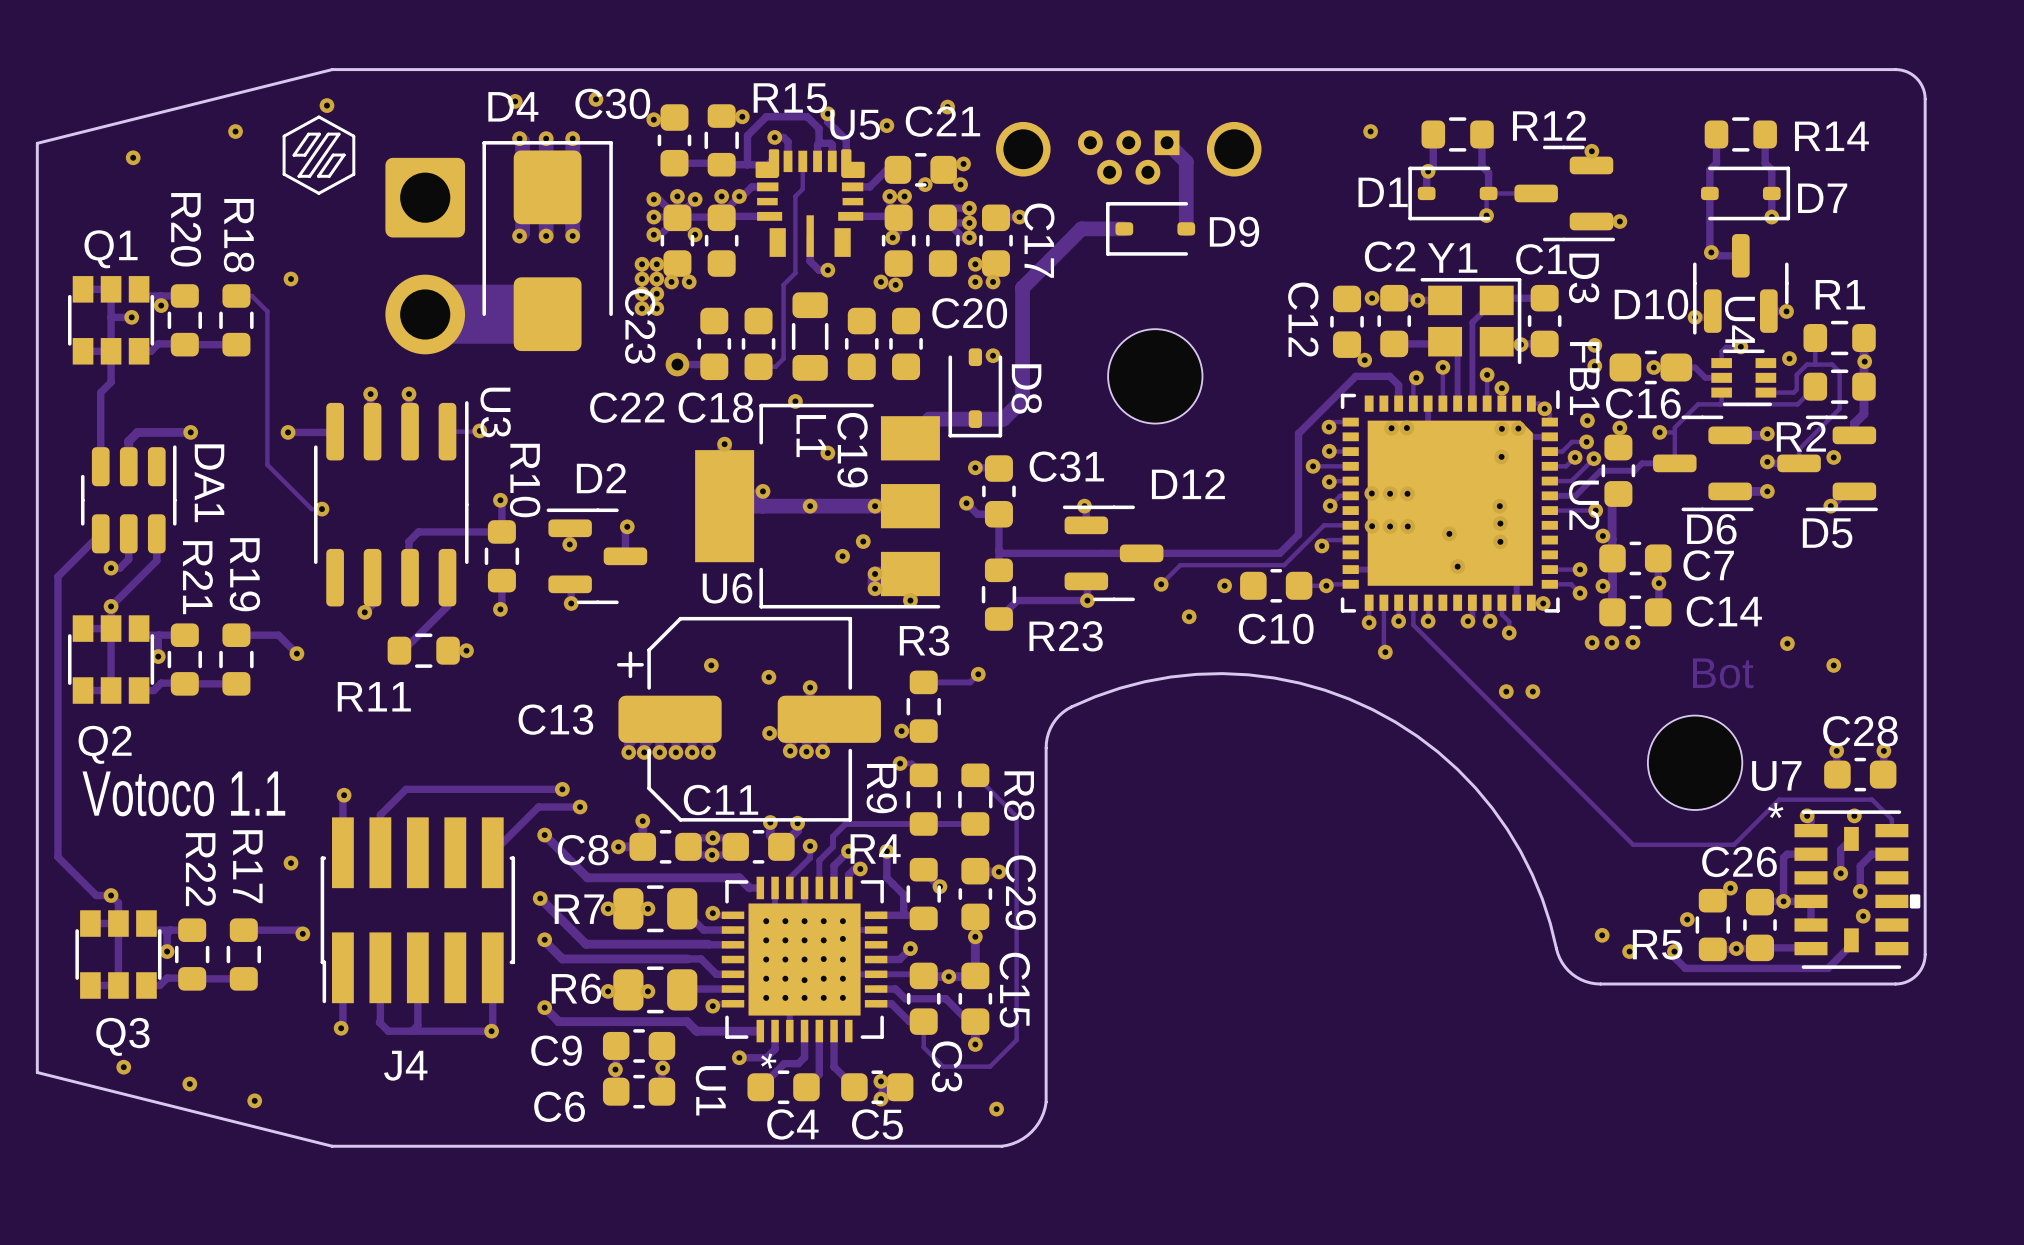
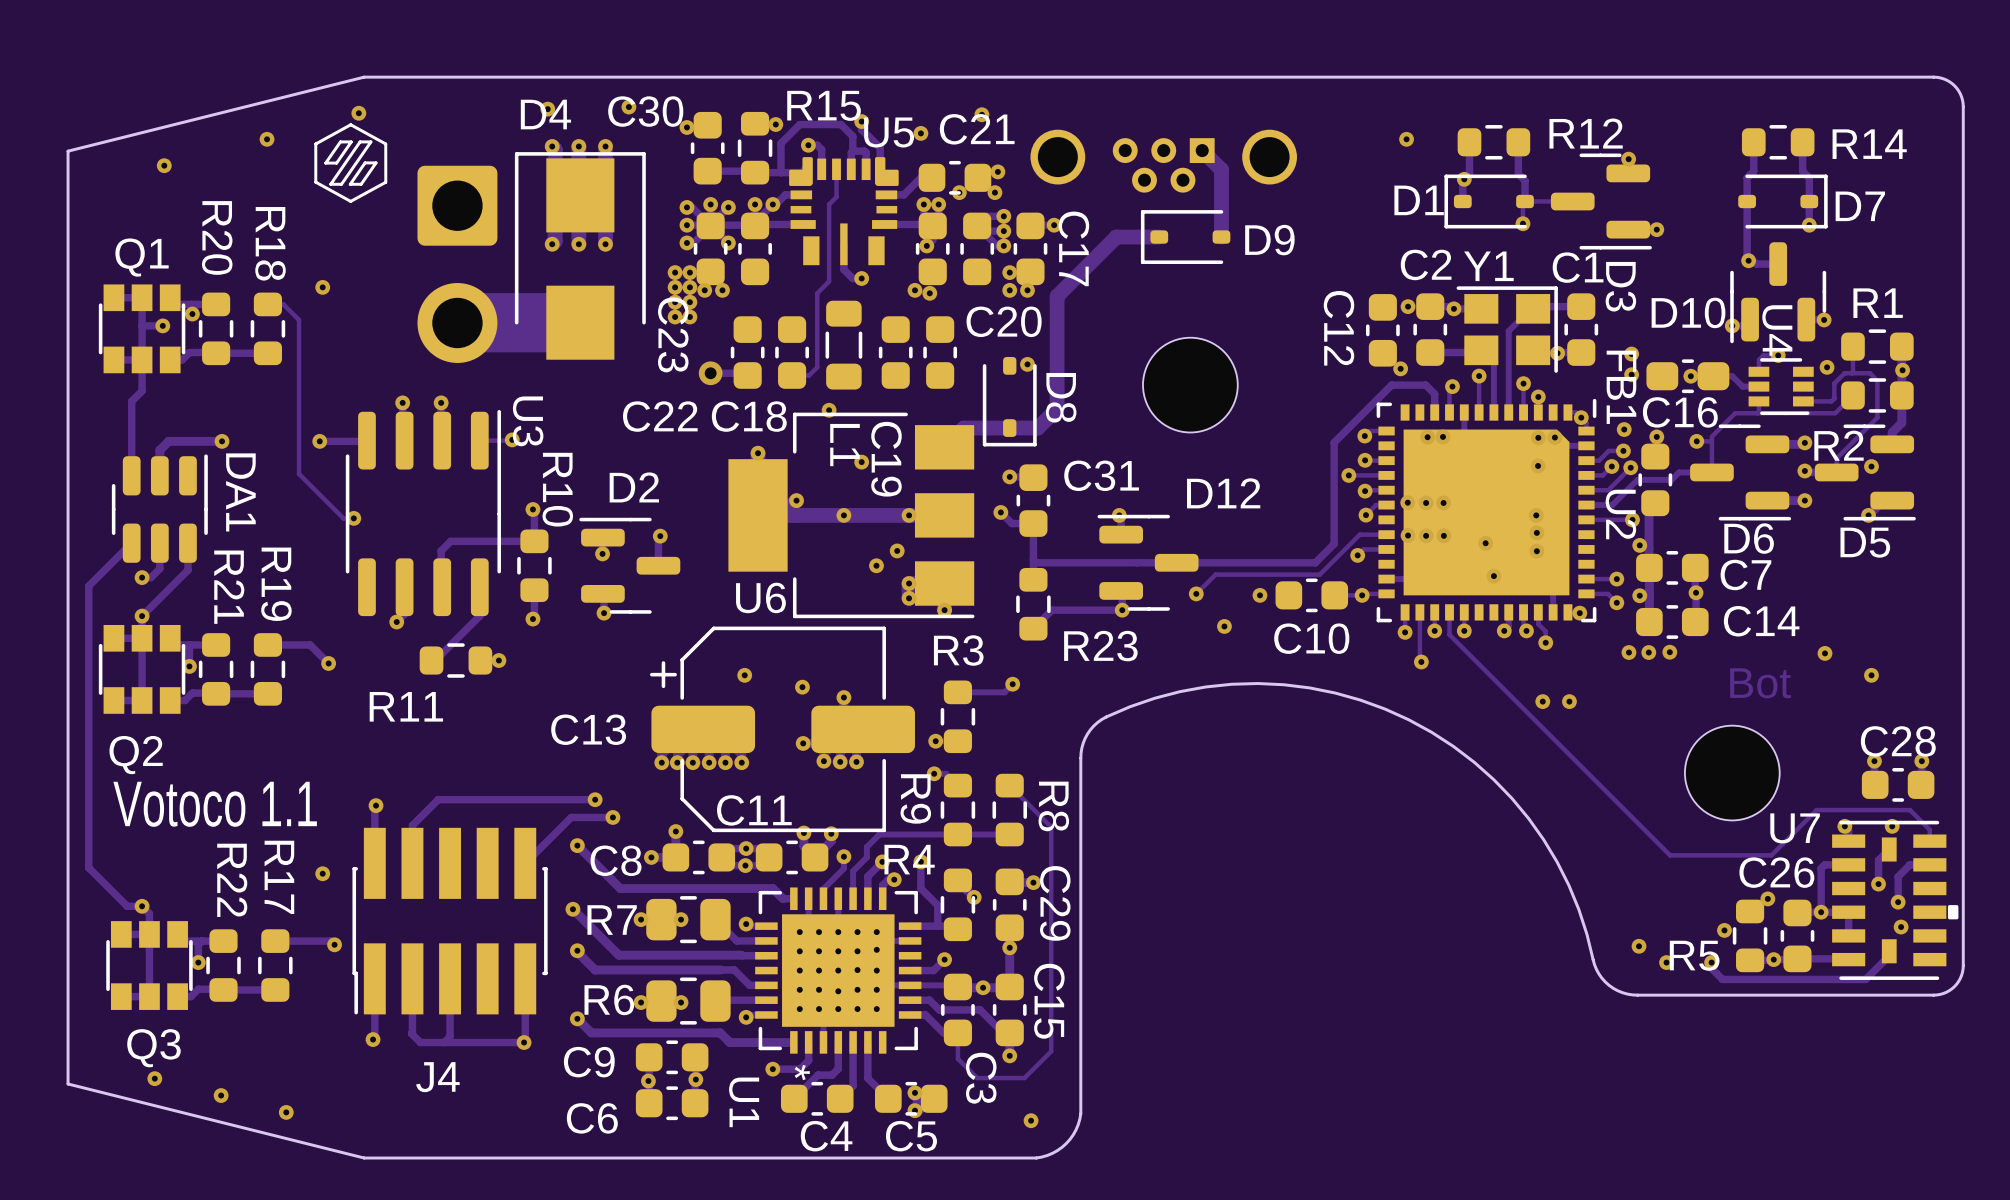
D4 footprint: [482, 141, 613, 352] -> [514, 152, 646, 360]
U7 name position: U7 (1776, 776) -> U7 (1795, 828)
U7 text: * (1775, 810) -> none

